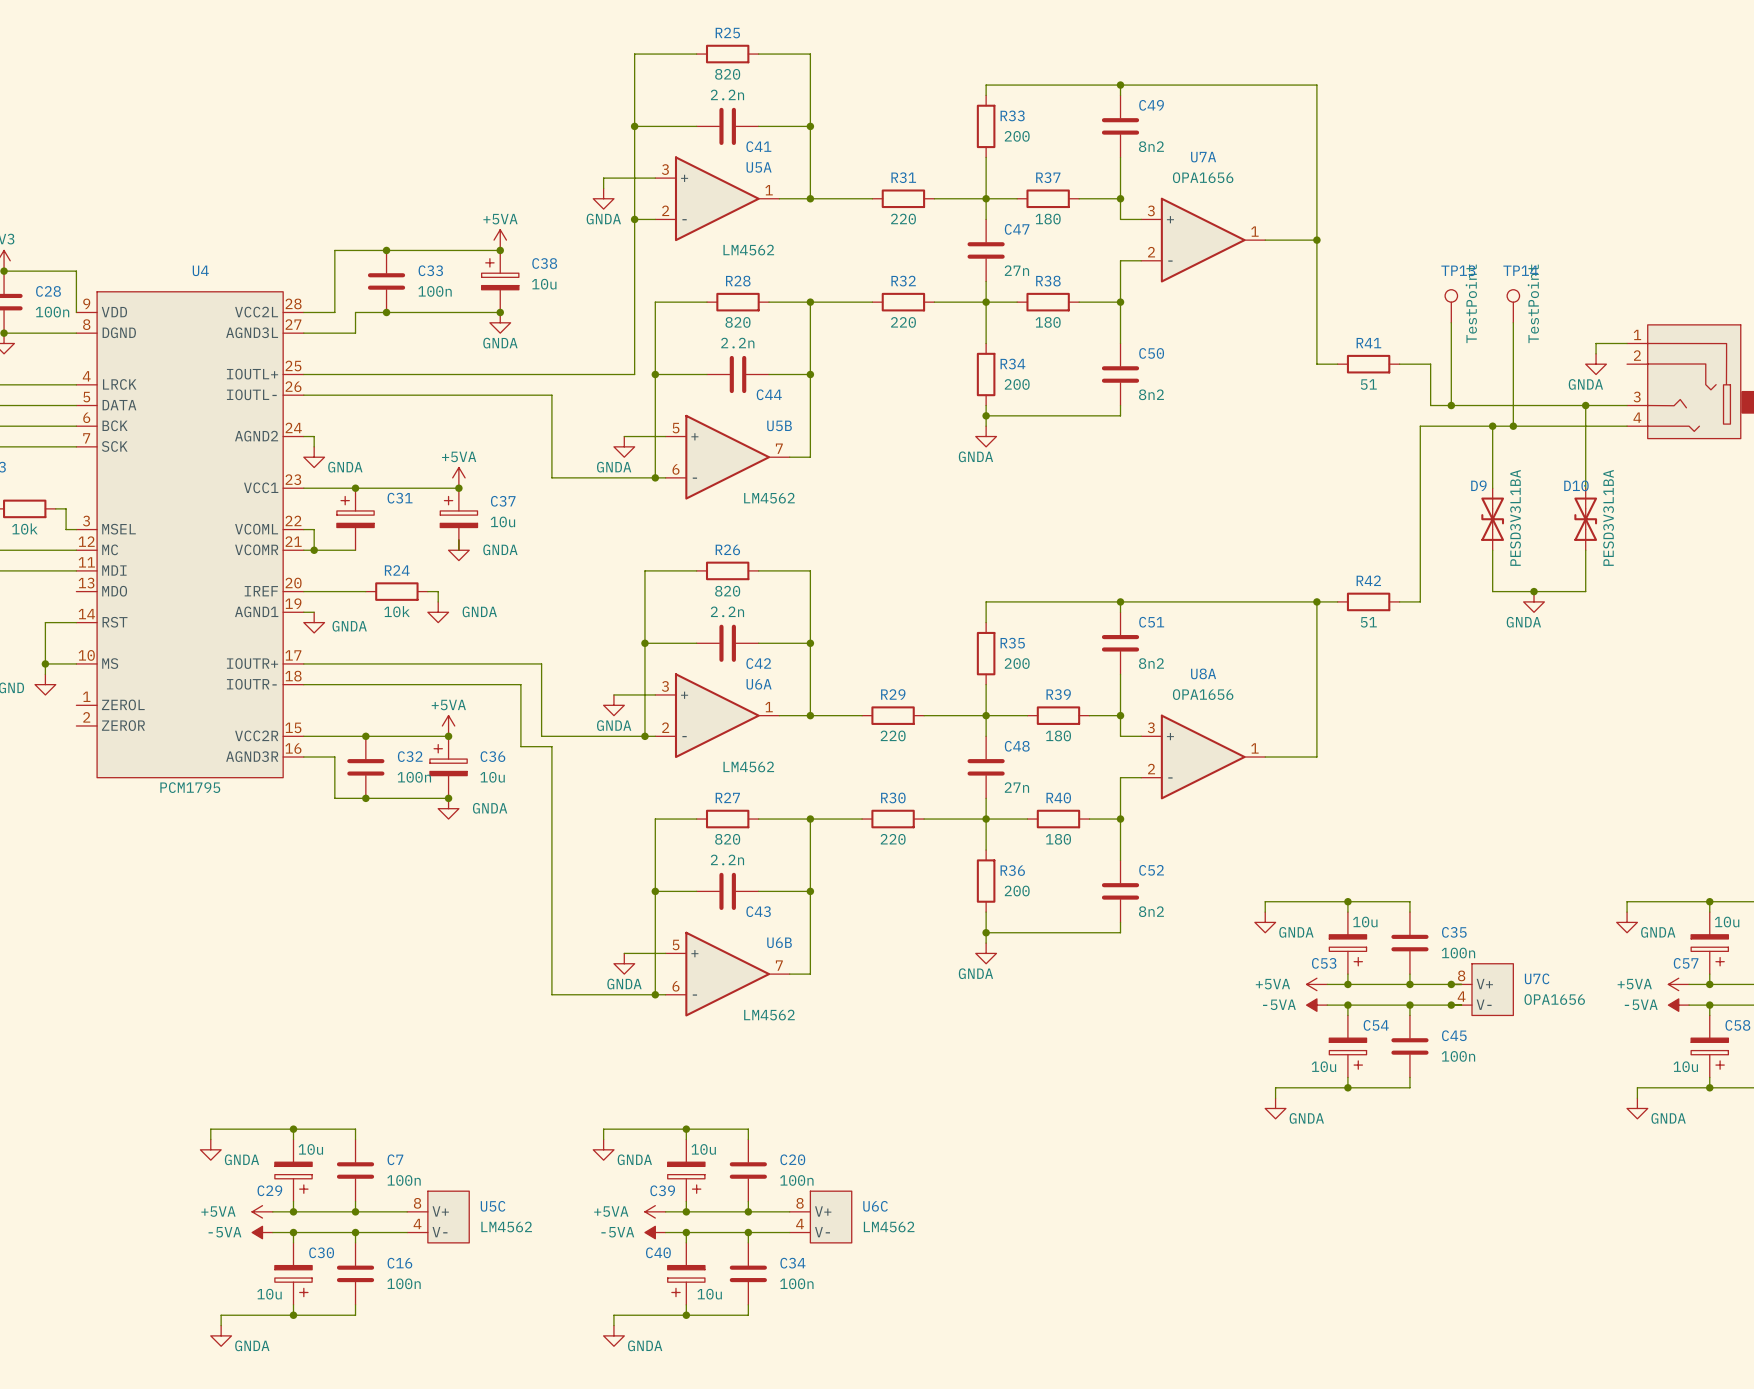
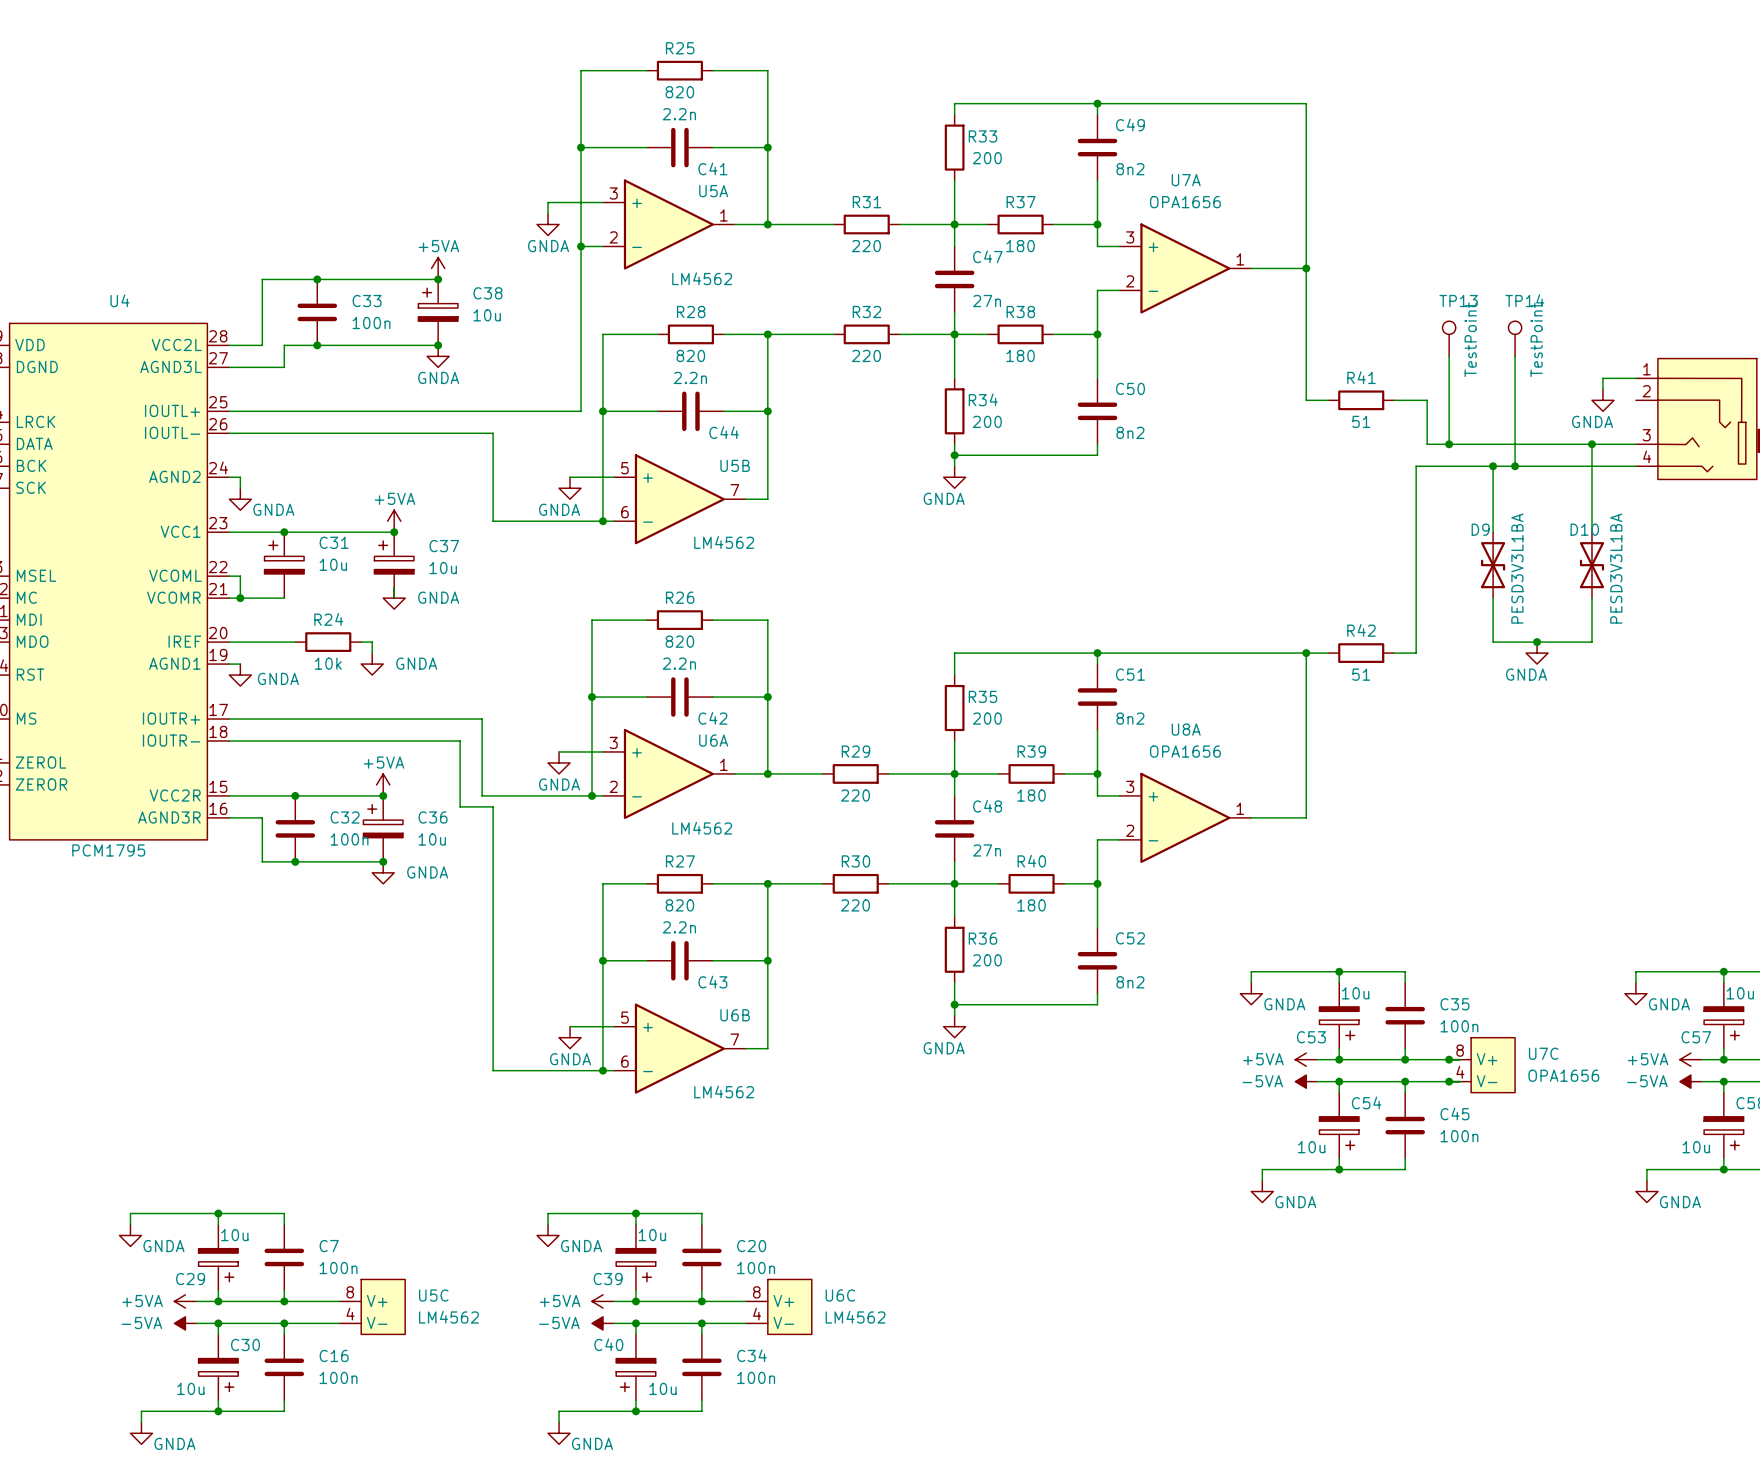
C31 value: none -> 10u (333, 564)

